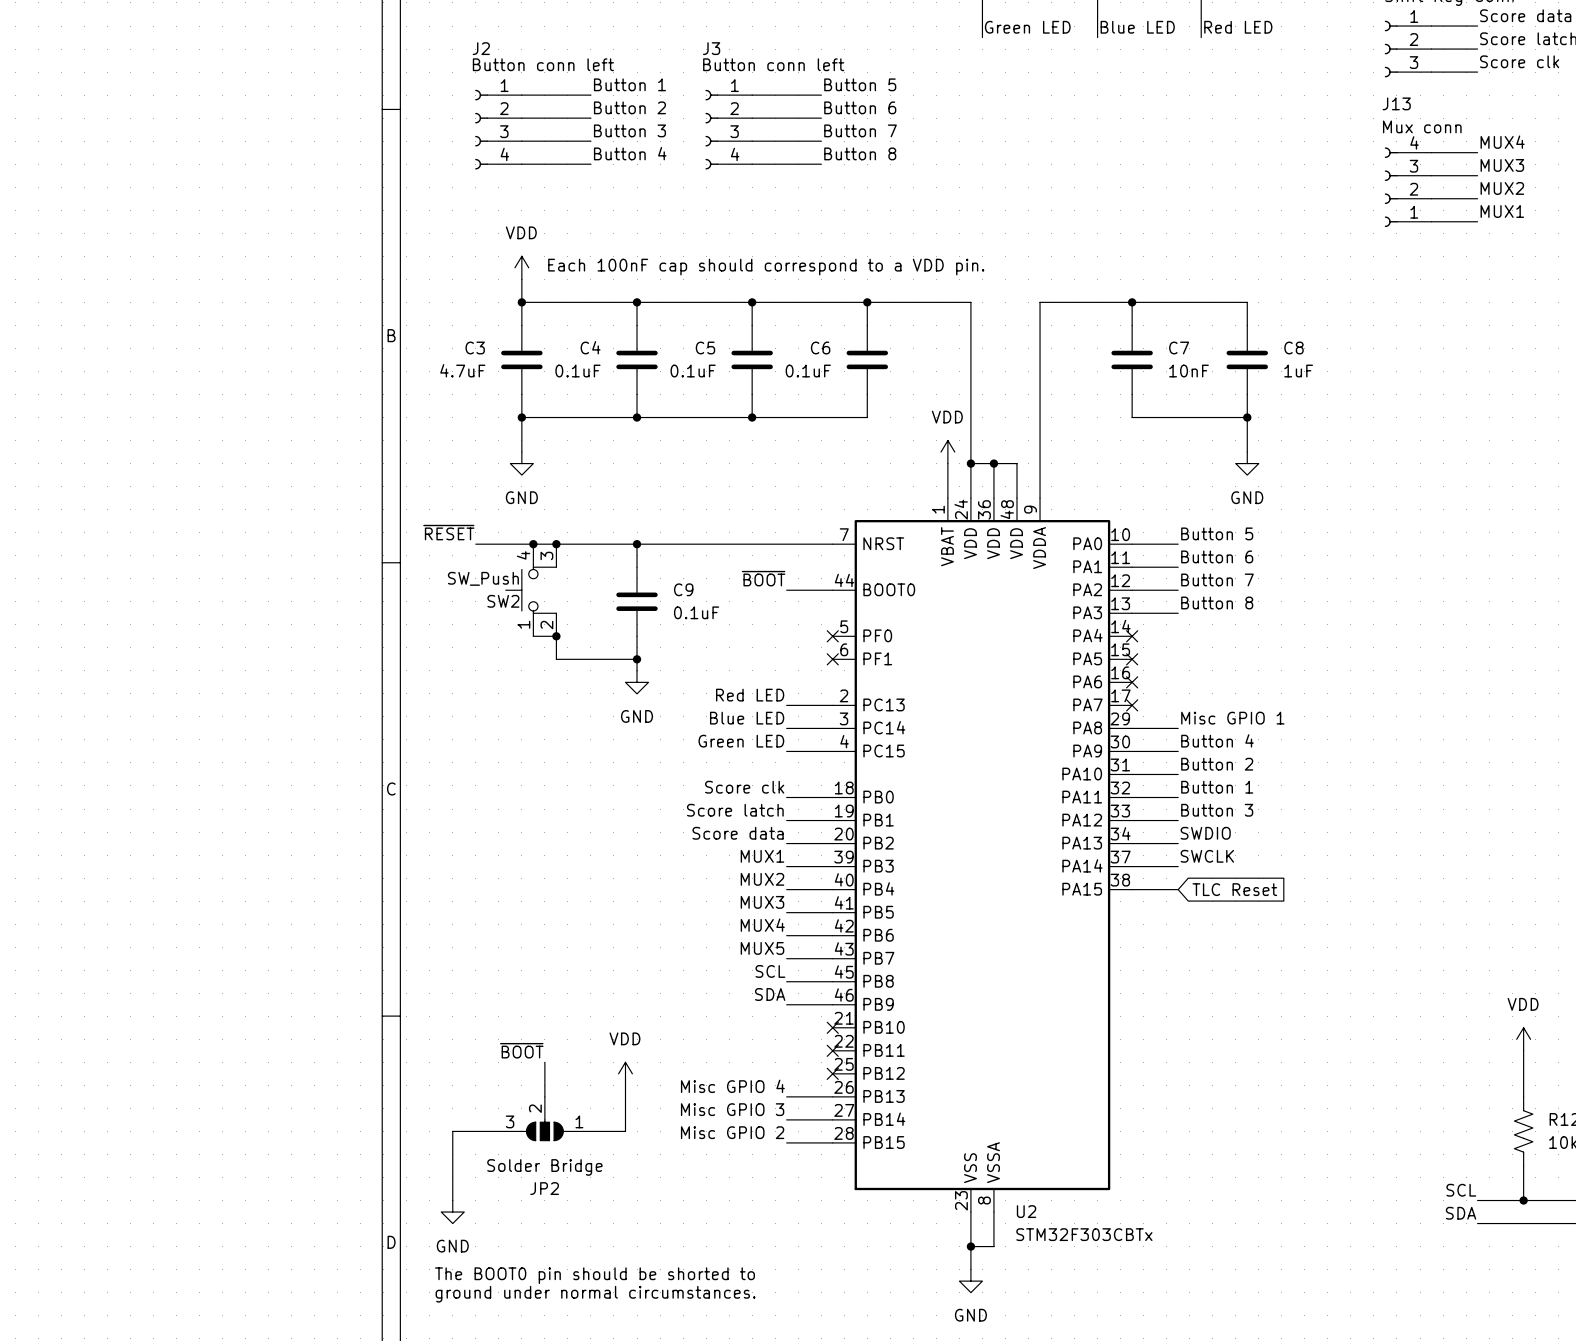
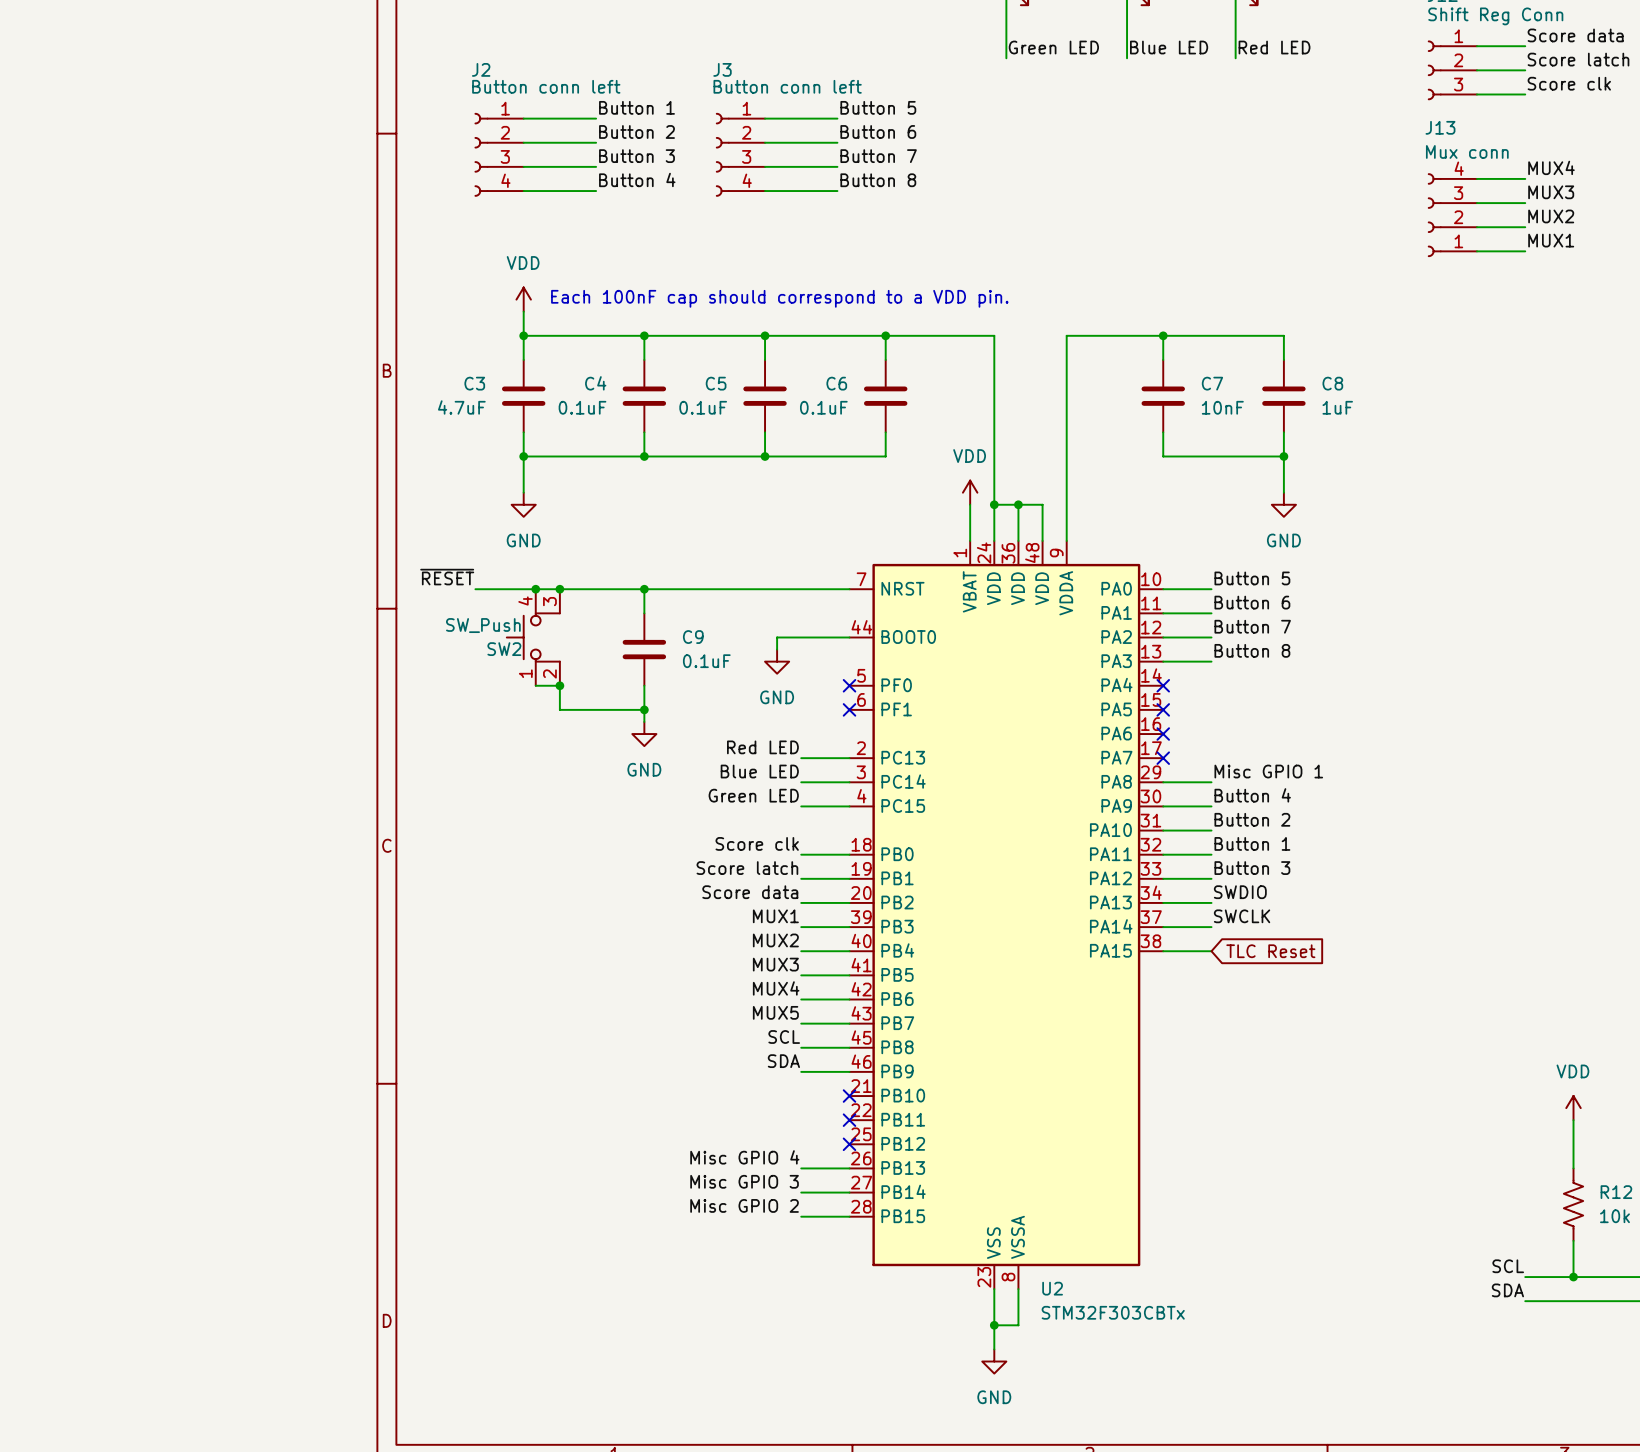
label: ~{BOOT} (763, 578) -> none
wire: none -> (801, 637) (777, 637) (777, 649)
power symbol: none -> GND (777, 661)
label: ~{BOOT} (521, 1050) -> none
wire: (544, 1062) (544, 1096) -> none
power symbol: VDD (625, 1073) -> none
wire: (625, 1085) (625, 1131) (590, 1131) -> none
JP2: Solder Bridge (544, 1118) -> none
wire: (498, 1131) (452, 1131) (452, 1200) -> none
power symbol: GND (452, 1212) -> none
text: The BOOT0 pin should be shorted to (595, 1275) -> none
text: ground under normal circumstances. (595, 1294) -> none

